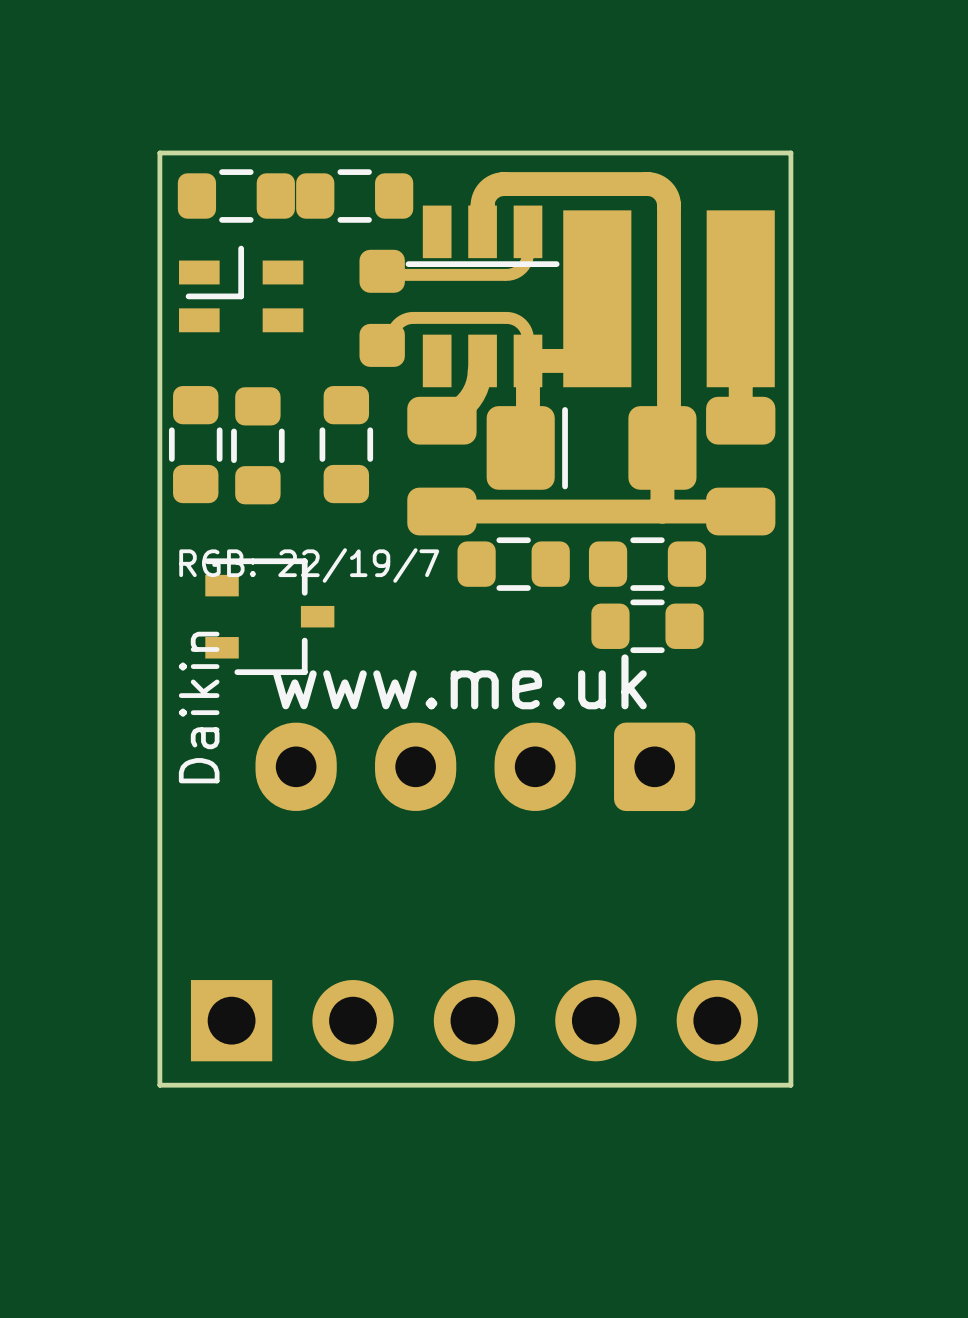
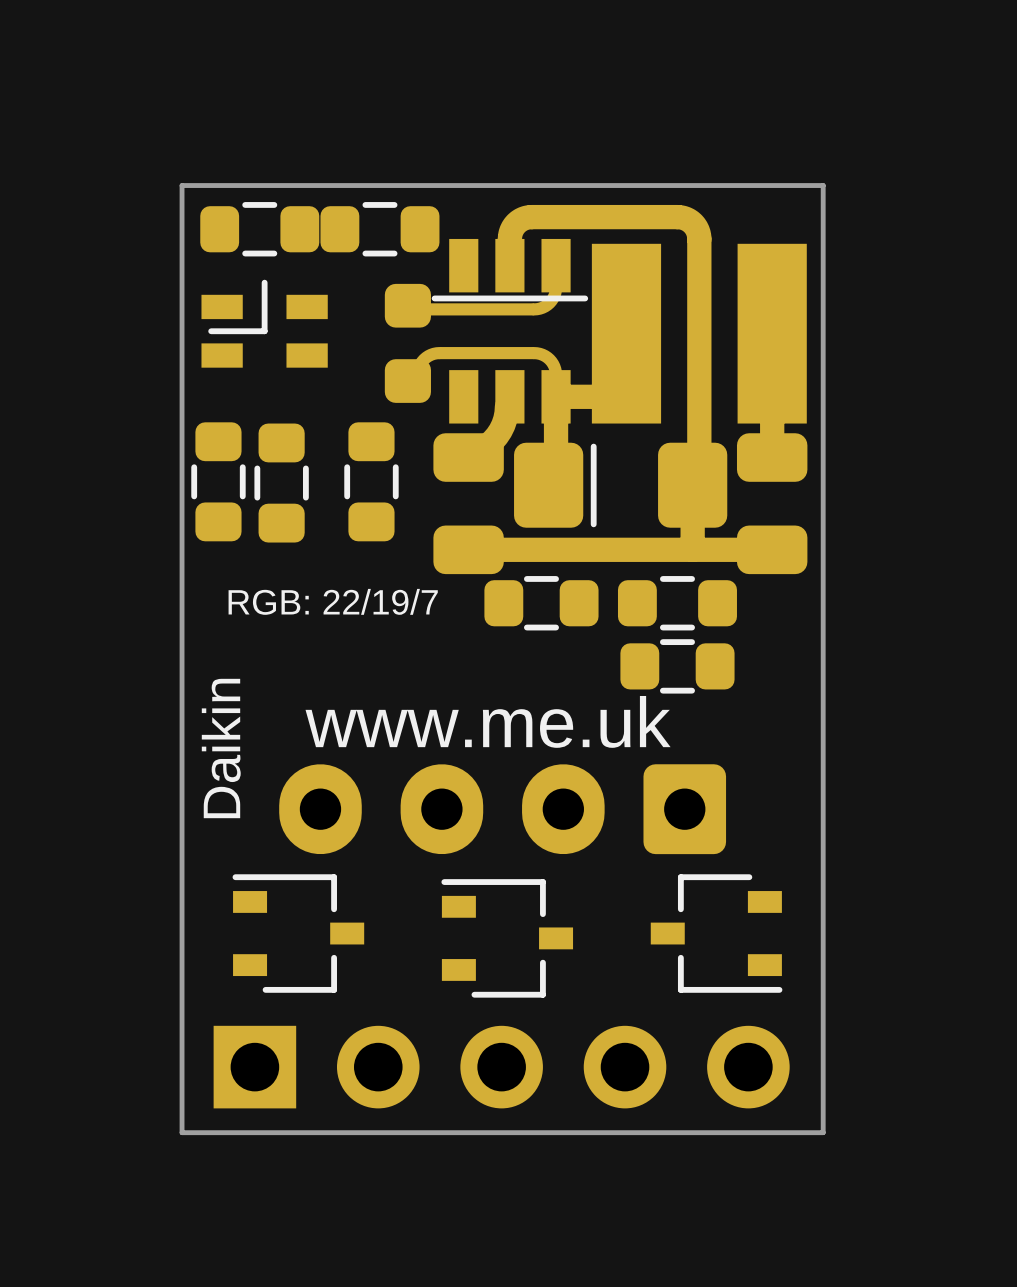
part: (269, 616) -> none
part: none -> (298, 933)
part: none -> (716, 933)
part: none -> (507, 938)

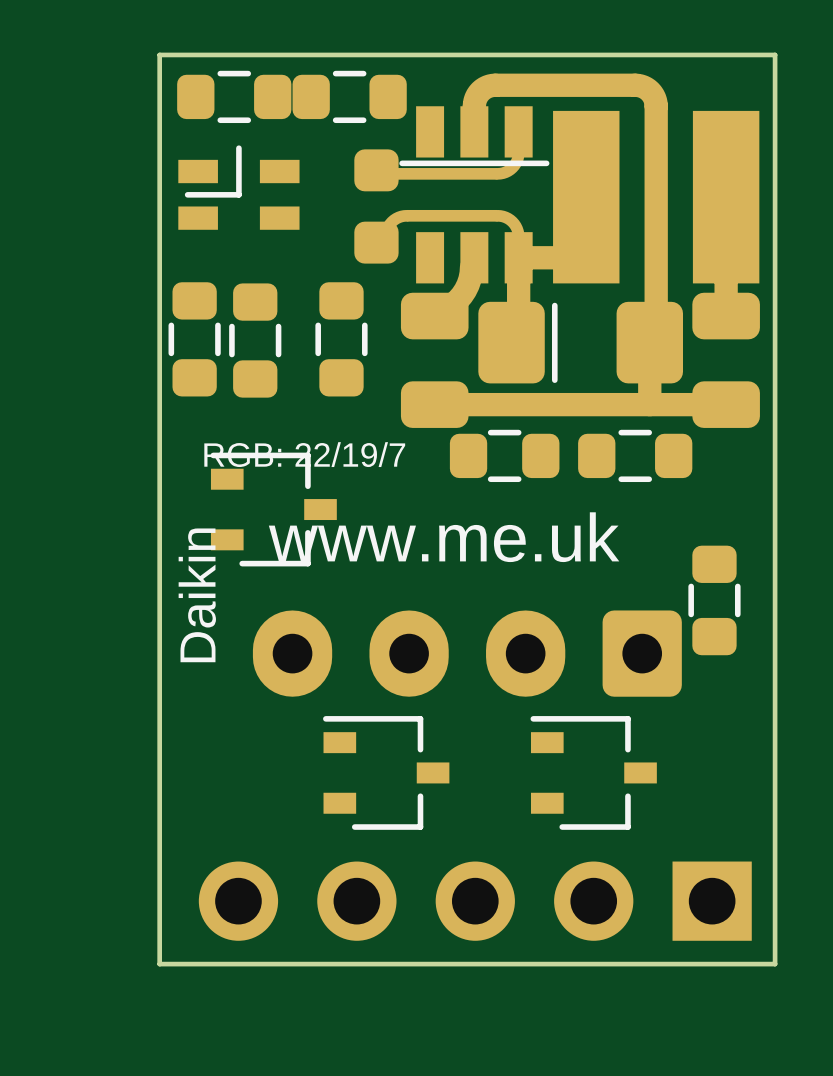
part: none -> (273, 509)
part rotation: 0° (677, 666) -> 90° clockwise (714, 600)
part position: (677, 666) -> (714, 600)
text position: www.me.uk (488, 721) -> www.me.uk (444, 537)
part: (298, 933) -> none
part: none -> (386, 772)
part: none -> (593, 772)
part: (716, 933) -> none
part: (507, 938) -> none
part side: bottom (501, 1067) -> top (475, 901)

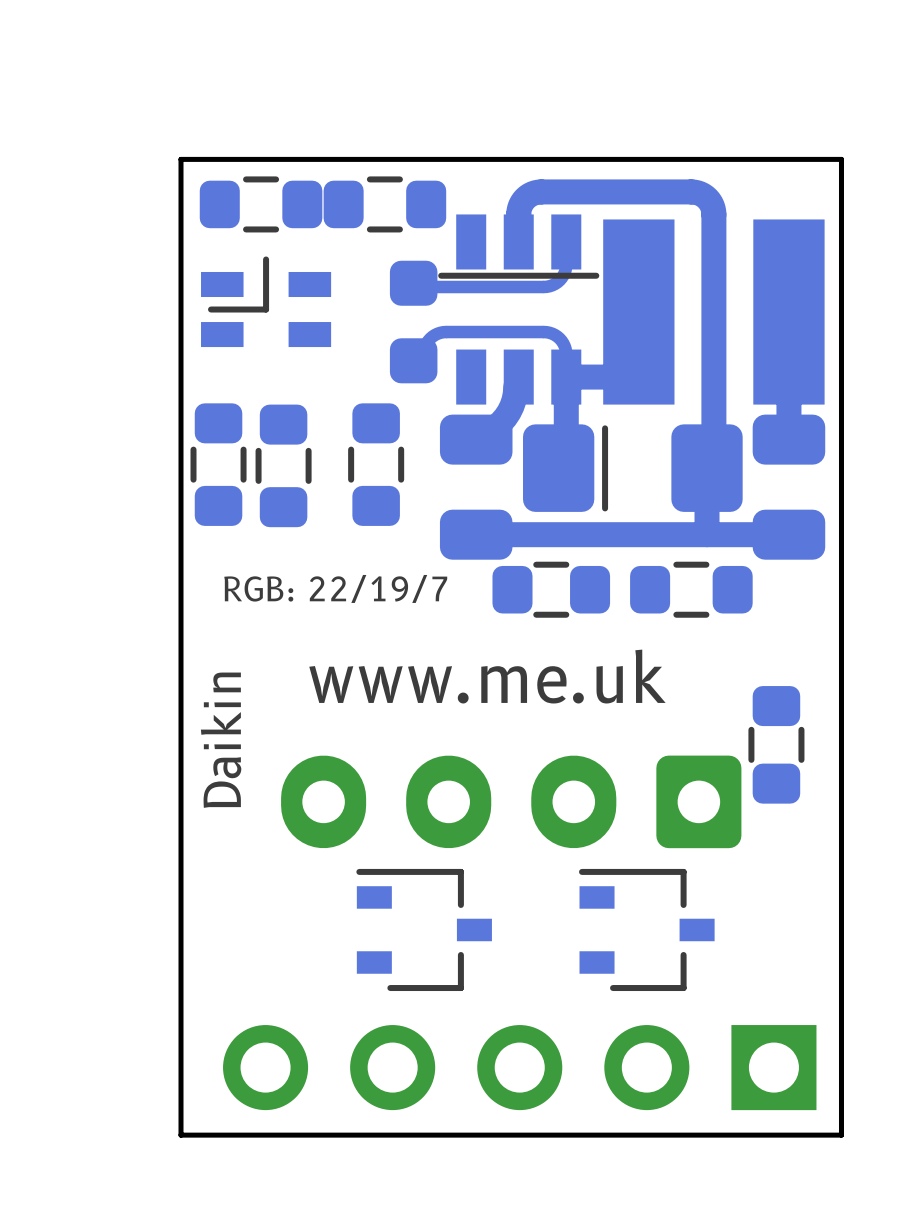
part: (273, 509) -> none

